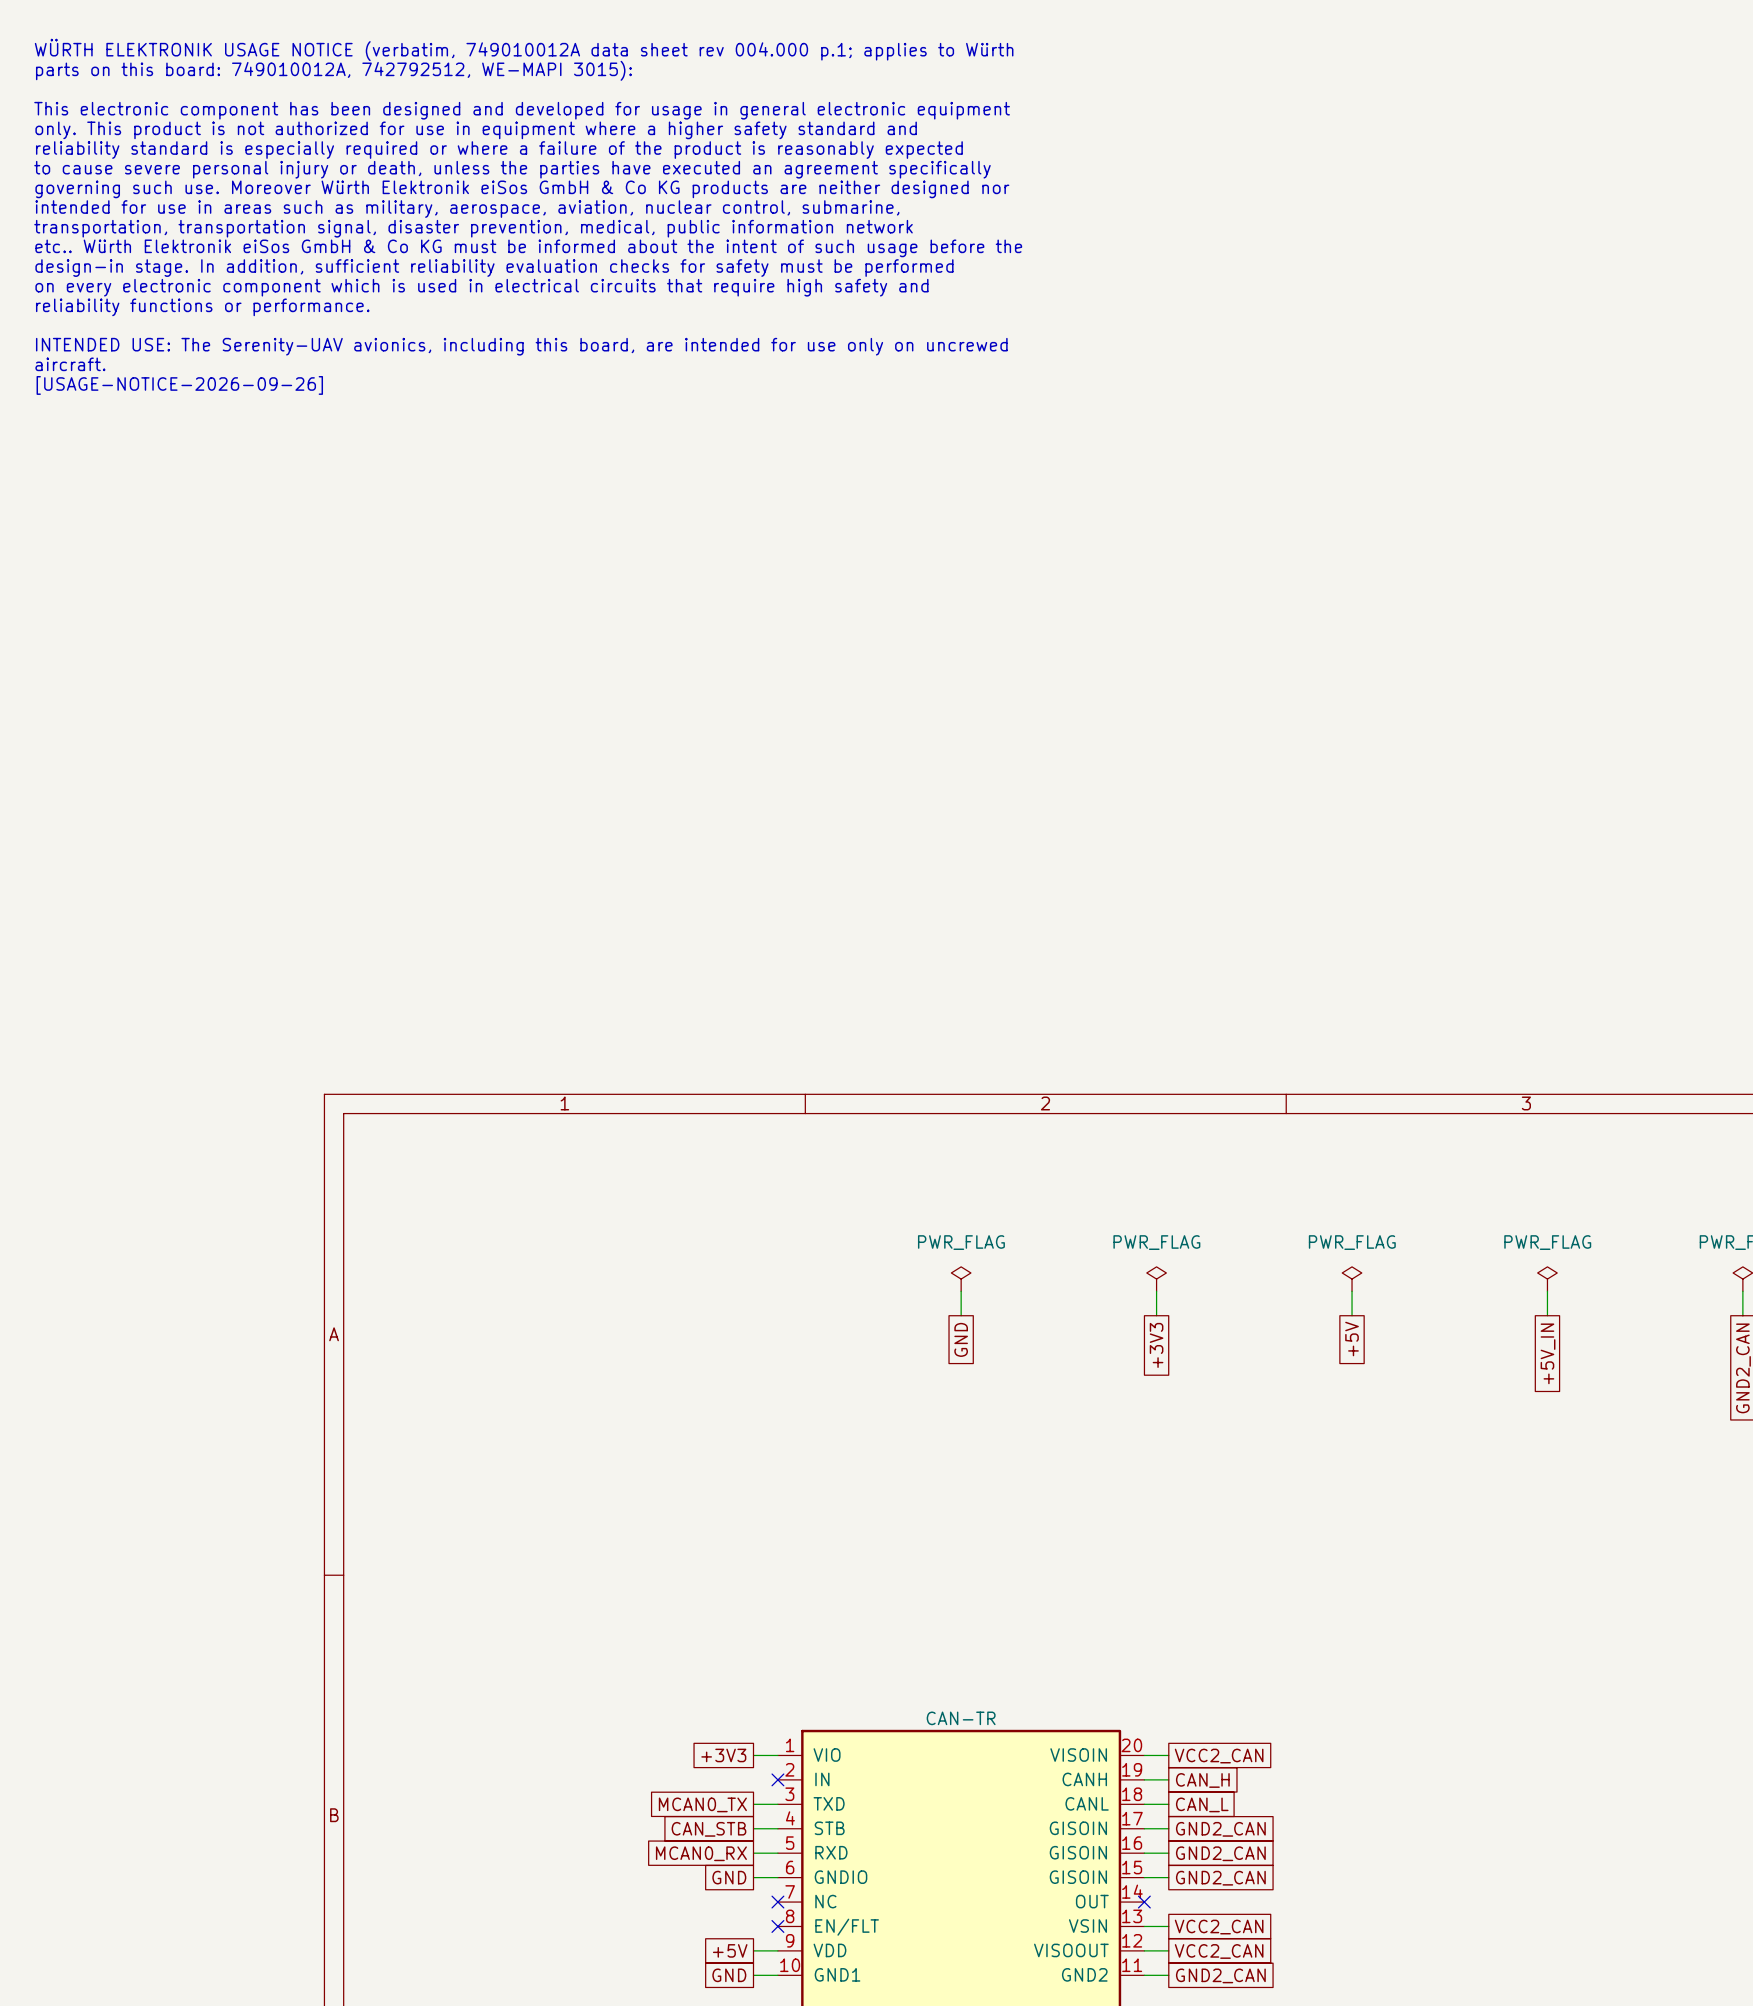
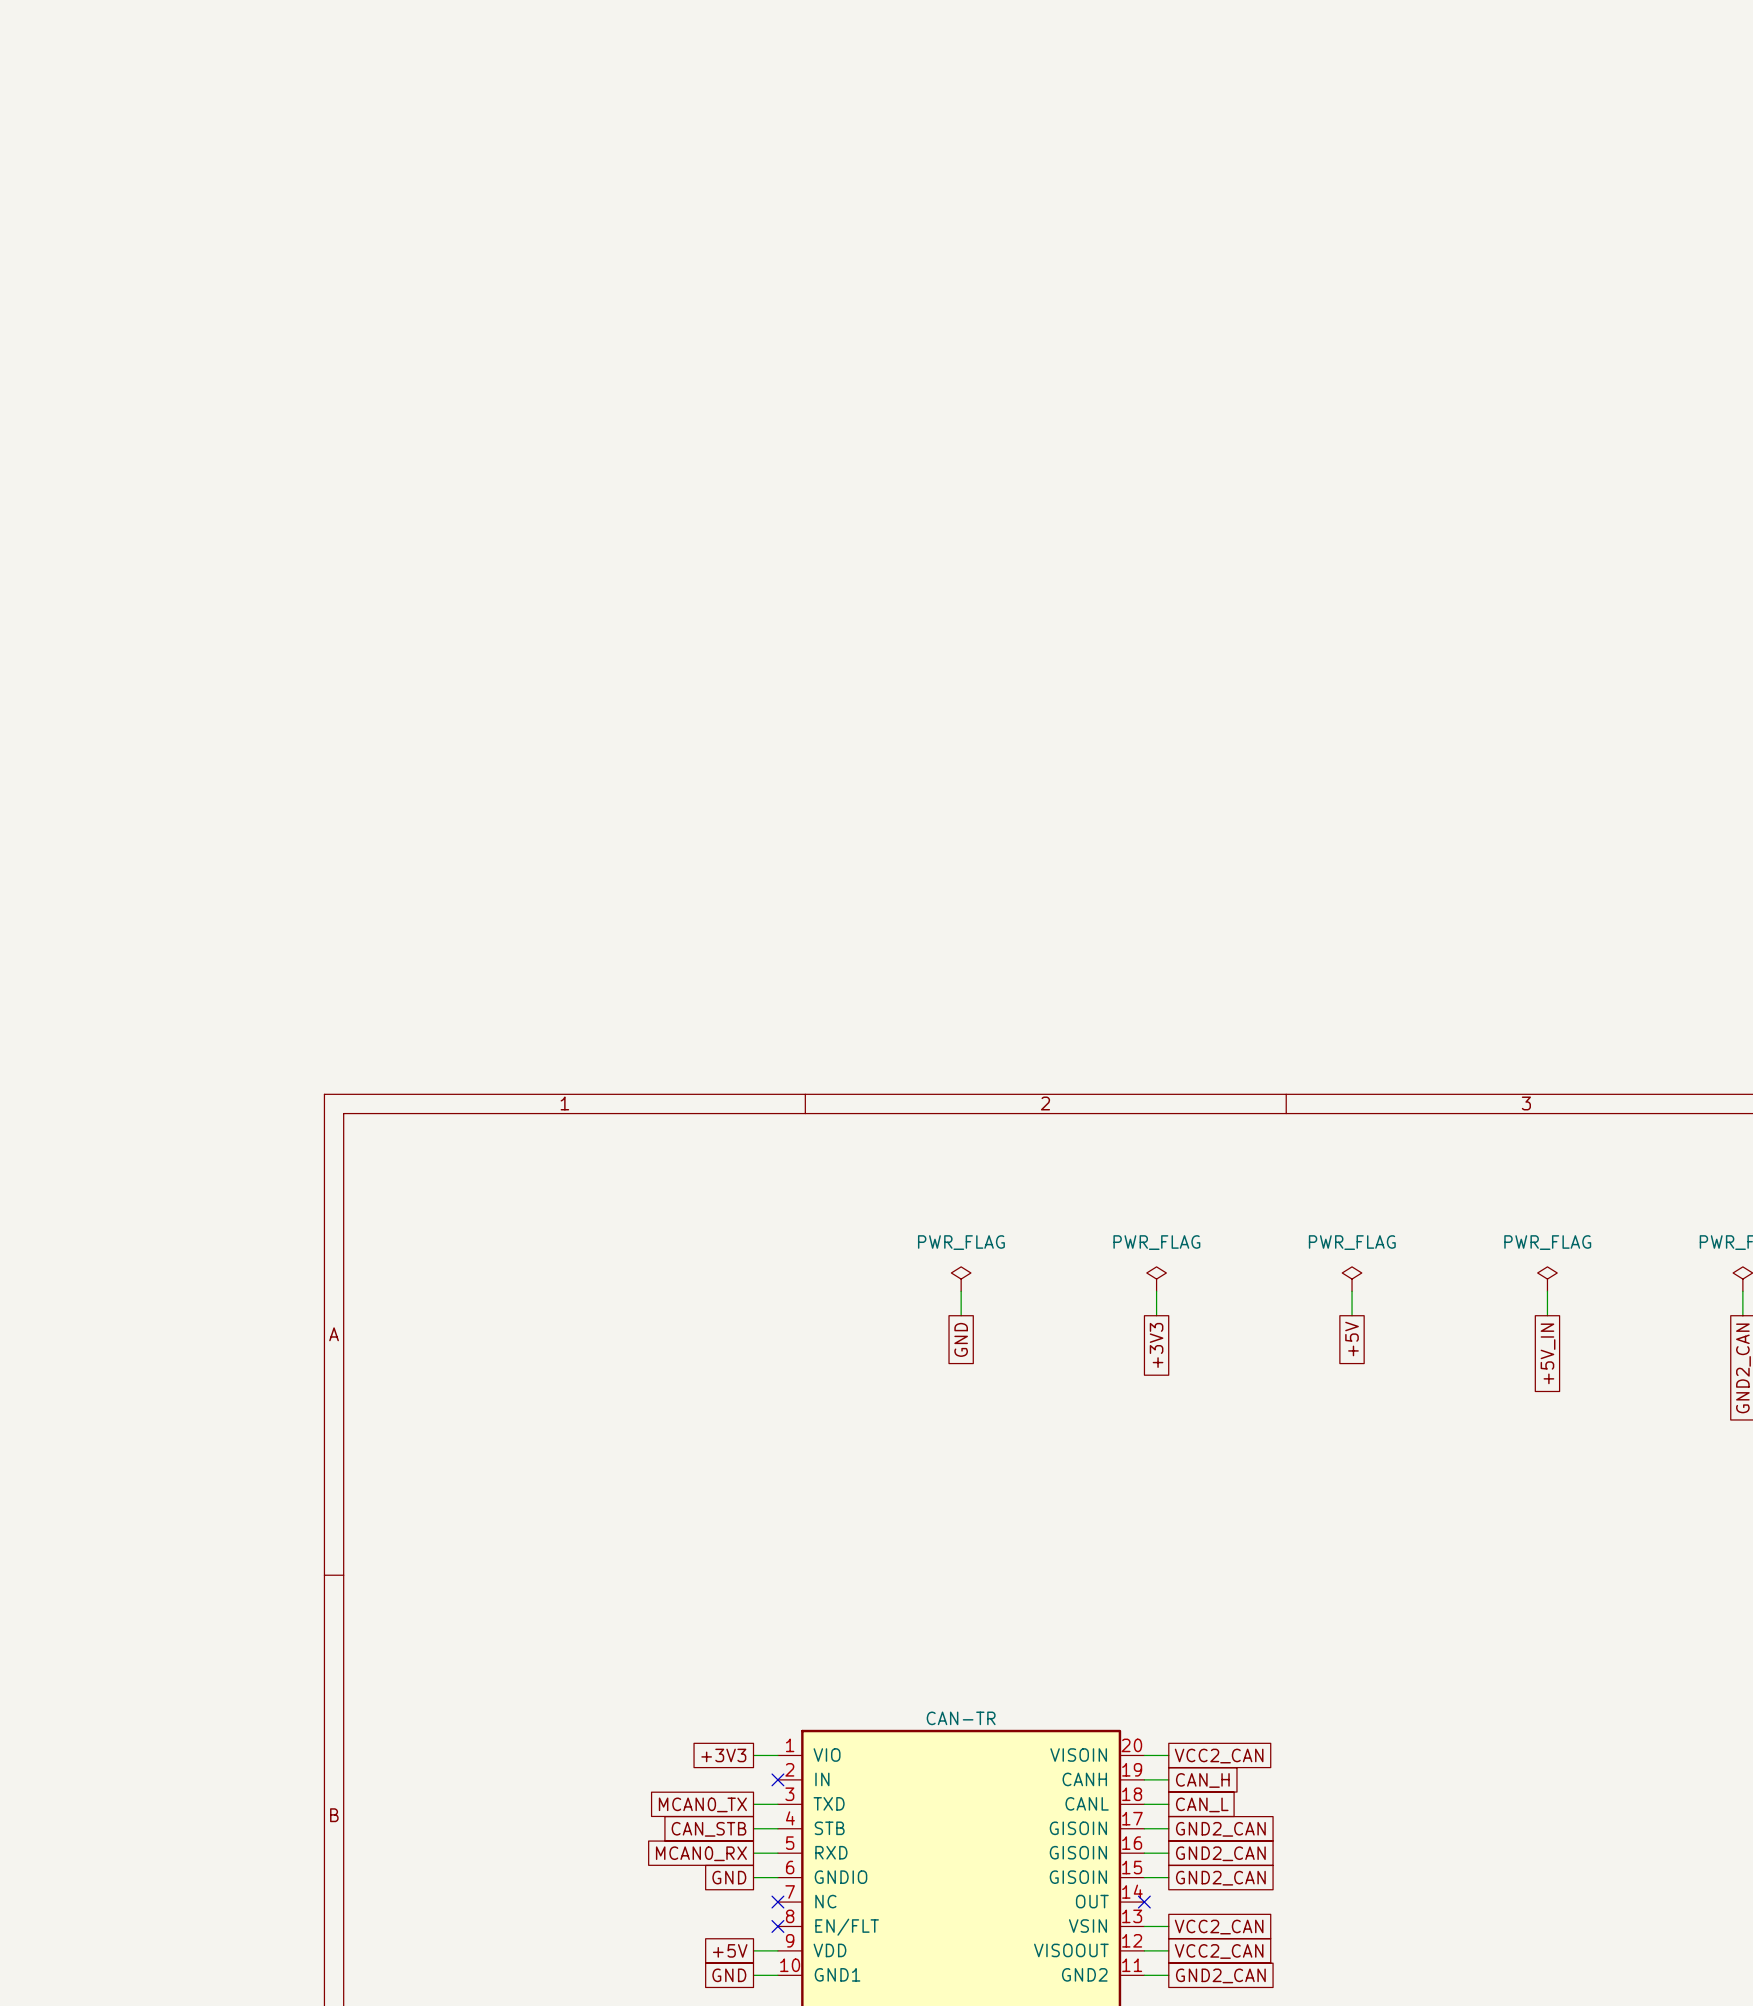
text: WÜRTH ELEKTRONIK USAGE NOTICE (verbatim, 749010012A data sheet rev 004.000 p.1; applies to Würth (524, 49) -> none
text: parts on this board: 749010012A, 742792512, WE-MAPI 3015): (333, 70) -> none
text: This electronic component has been designed and developed for usage in general electronic equipment (522, 110) -> none
text: only. This product is not authorized for use in equipment where a higher safety standard and (476, 130) -> none
text: reliability standard is especially required or where a failure of the product is reasonably expected (499, 150) -> none
text: to cause severe personal injury or death, unless the parties have executed an agreement specifically (512, 169) -> none
text: governing such use. Moreover Würth Elektronik eiSos GmbH & Co KG products are neither designed nor (522, 189) -> none
text: intended for use in areas such as military, aerospace, aviation, nuclear control, submarine, (467, 209) -> none
text: transportation, transportation signal, disaster prevention, medical, public information network (473, 228) -> none
text: etc.. Würth Elektronik eiSos GmbH & Co KG must be informed about the intent of such usage before the (528, 248) -> none
text: design-in stage. In addition, sufficient reliability evaluation checks for safety must be performed (494, 268) -> none
text: on every electronic component which is used in electrical circuits that require high safety and (481, 287) -> none
text: reliability functions or performance. (202, 307) -> none
text: INTENDED USE: The Serenity-UAV avionics, including this board, are intended for use only on uncrewed (521, 346) -> none
text: aircraft. (70, 364) -> none
text: [USAGE-NOTICE-2026-09-26] (179, 385) -> none

